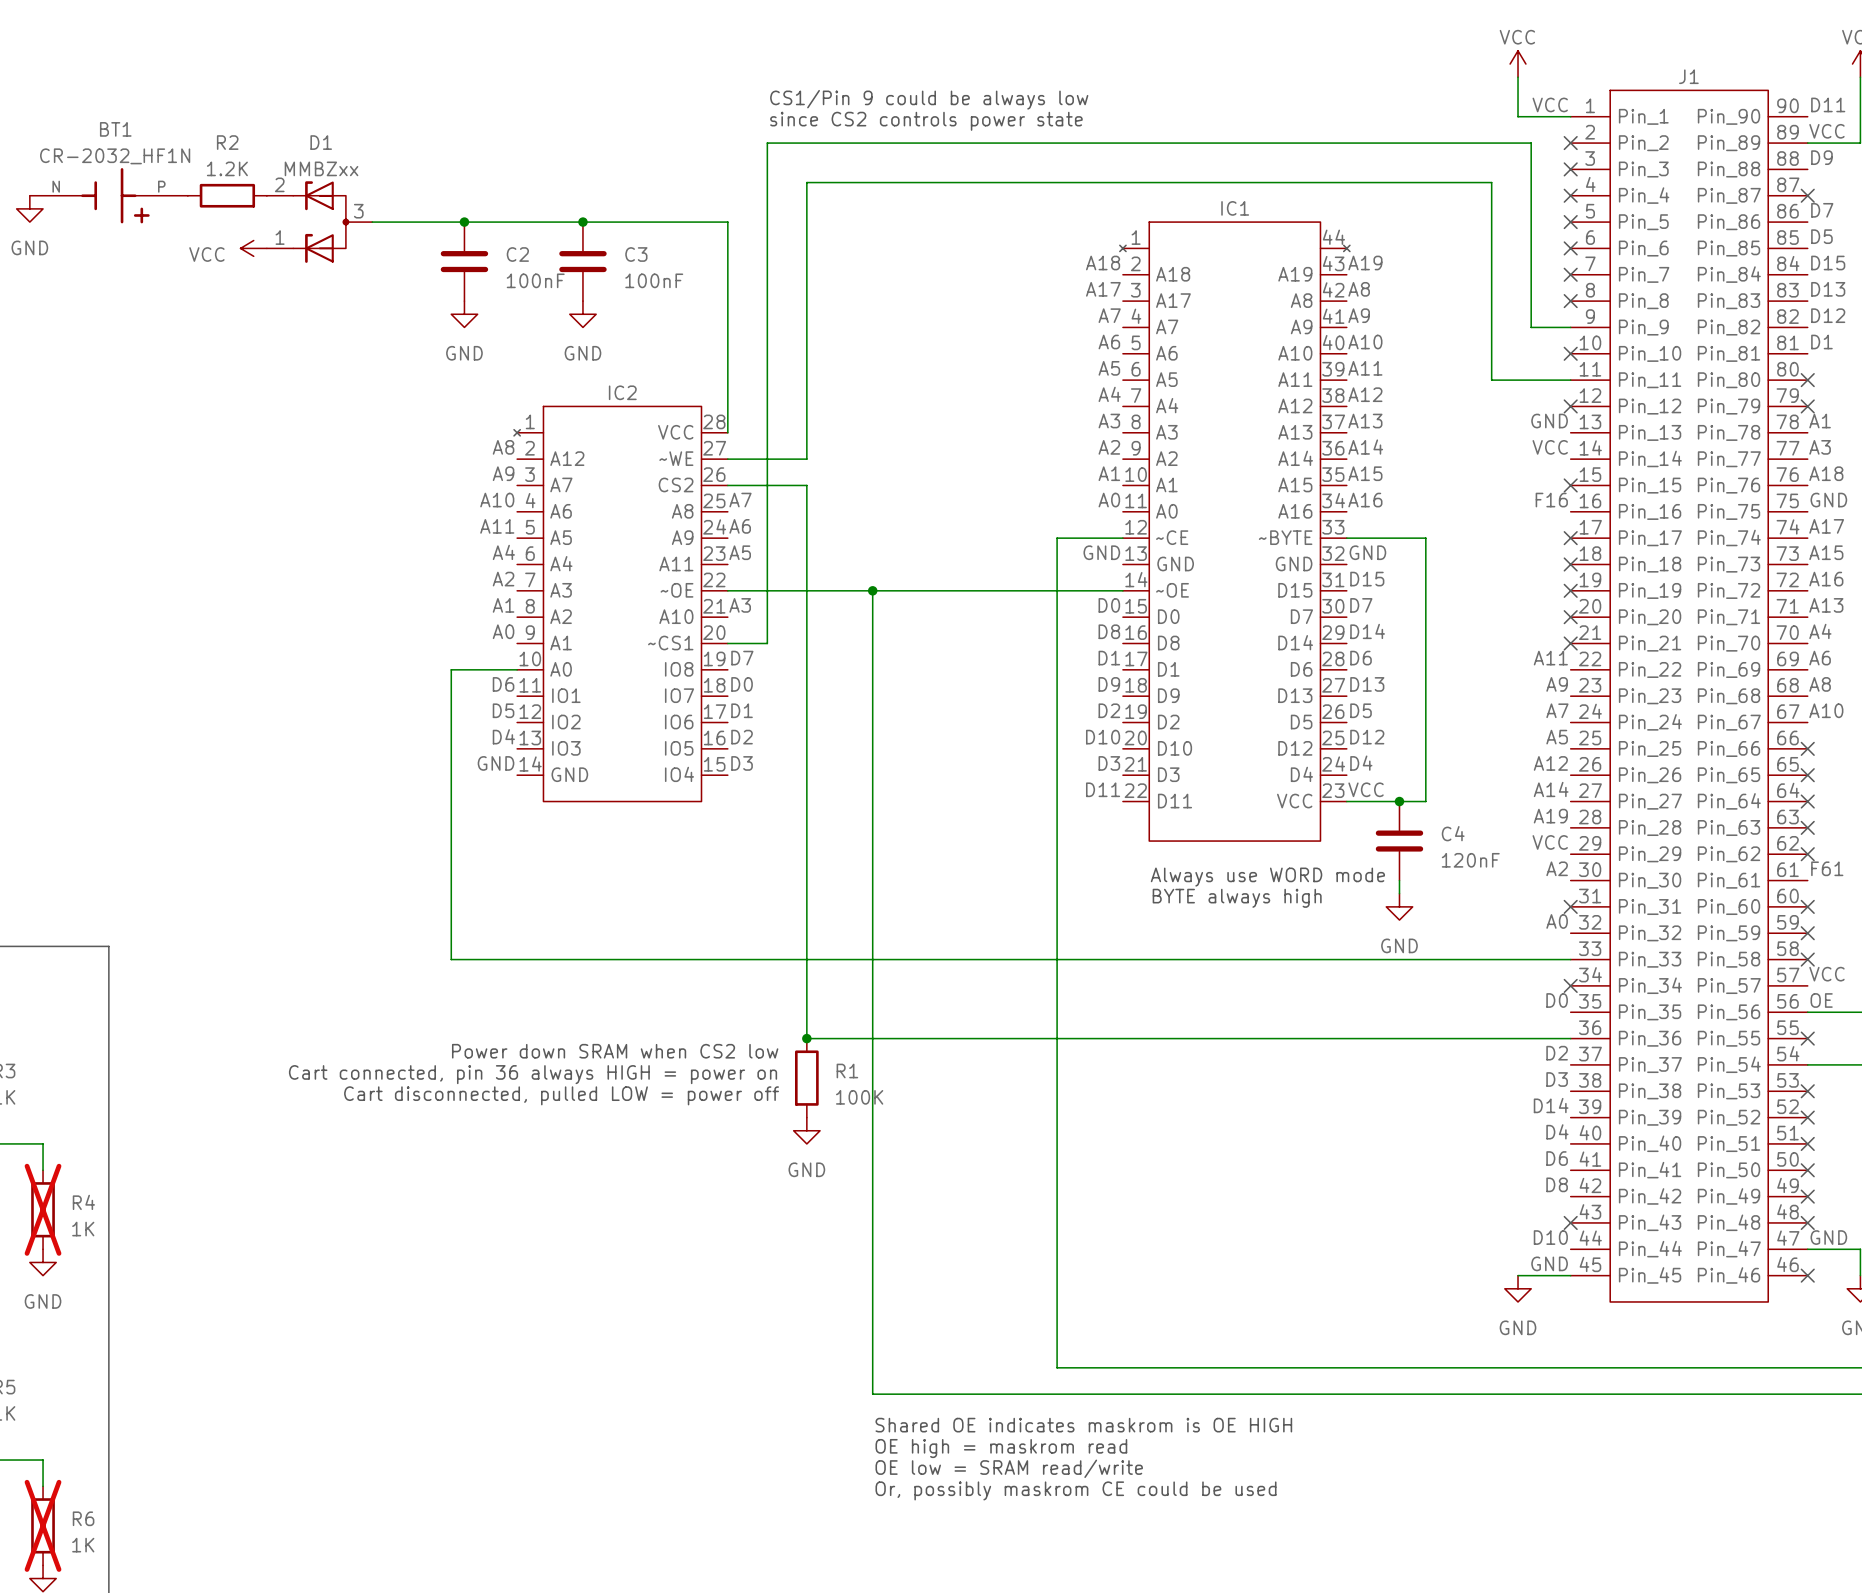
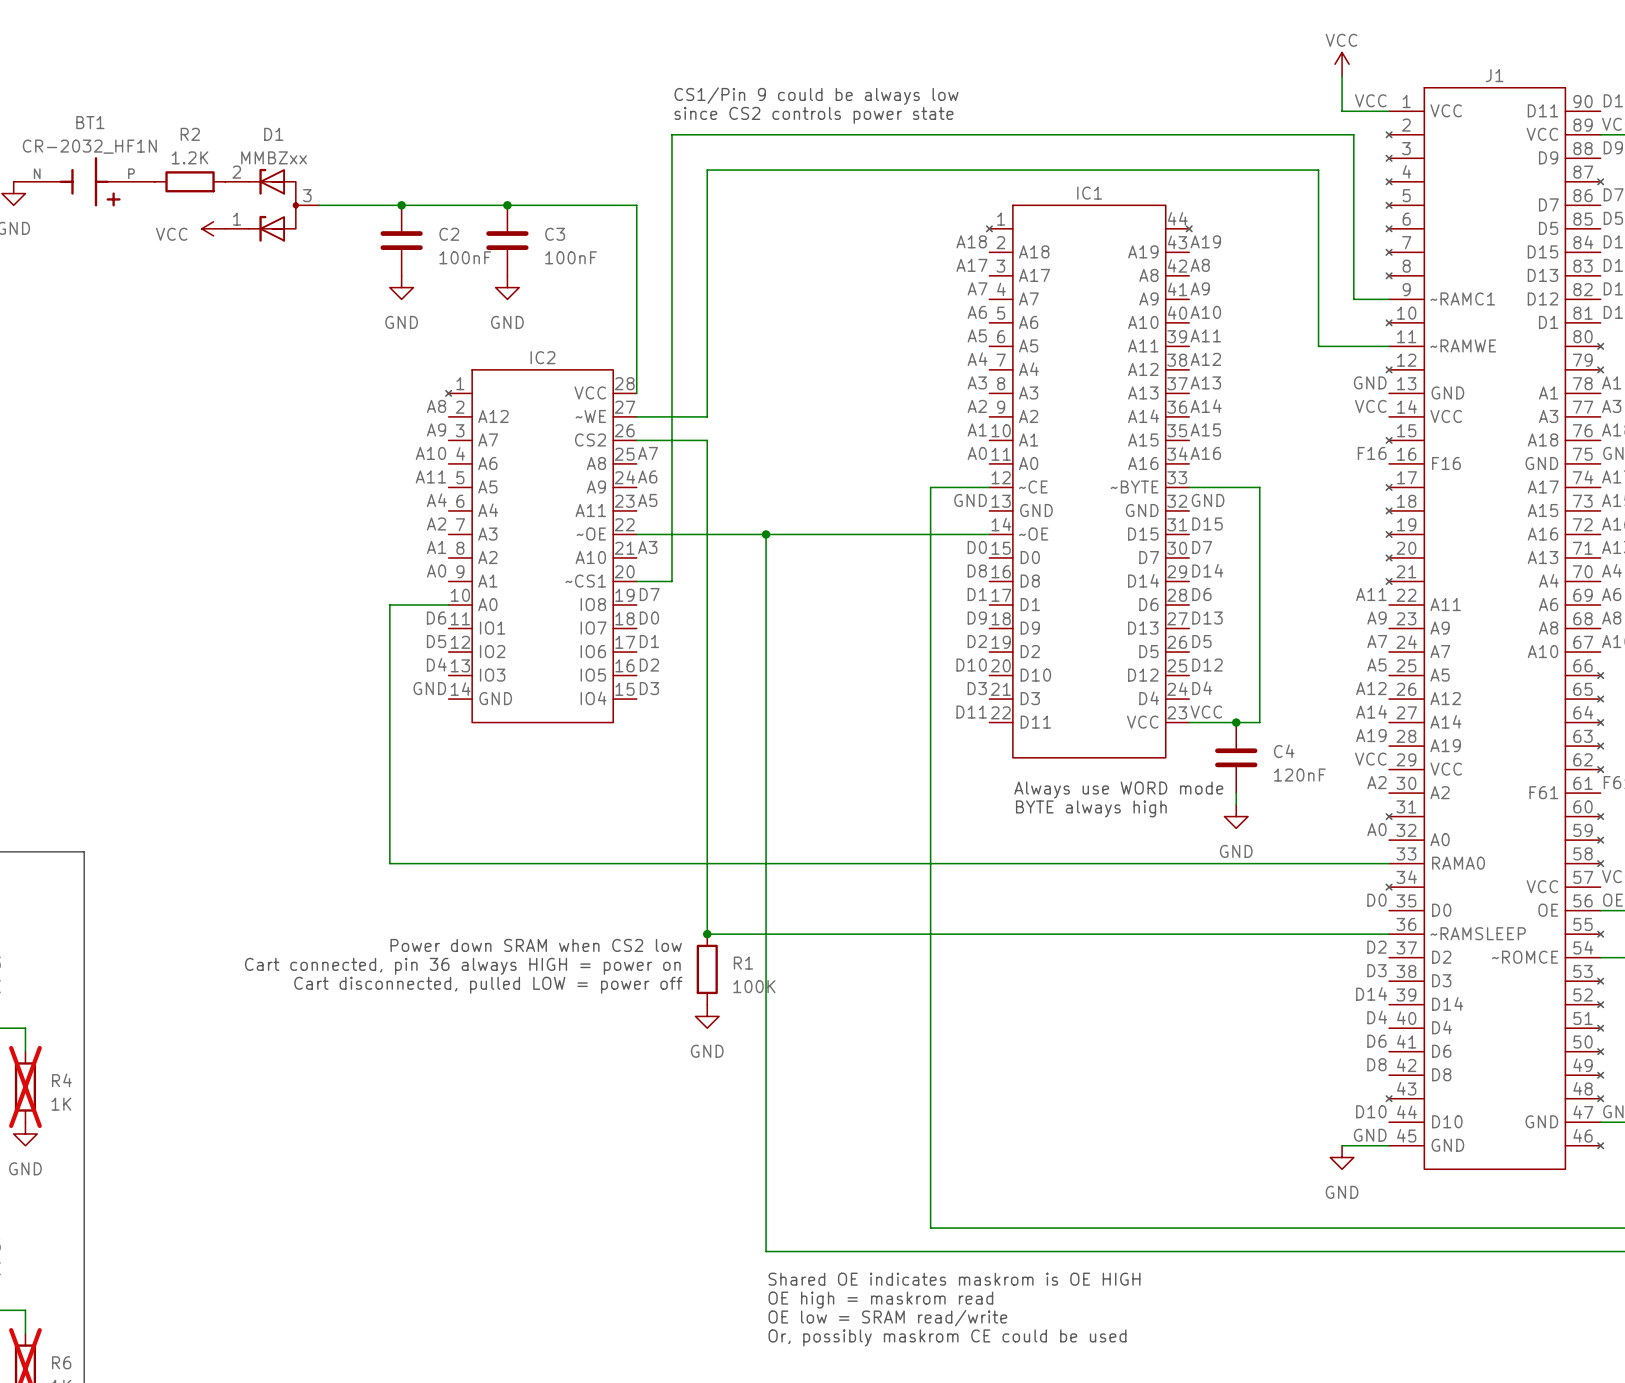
J1 symbol: [1570, 90, 1808, 1302] -> [1386, 87, 1604, 1170]
no-connect mark: (1570, 143) -> none
no-connect mark: (1570, 169) -> none
no-connect mark: (1570, 195) -> none
no-connect mark: (1807, 195) -> none
no-connect mark: (1570, 222) -> none
no-connect mark: (1570, 248) -> none
no-connect mark: (1570, 274) -> none
no-connect mark: (1570, 301) -> none
no-connect mark: (1570, 353) -> none
no-connect mark: (1807, 380) -> none
no-connect mark: (1570, 406) -> none
no-connect mark: (1807, 406) -> none
no-connect mark: (1570, 485) -> none
no-connect mark: (1570, 538) -> none
no-connect mark: (1570, 564) -> none
no-connect mark: (1570, 590) -> none
no-connect mark: (1570, 617) -> none
no-connect mark: (1570, 643) -> none
no-connect mark: (1807, 748) -> none
no-connect mark: (1807, 775) -> none
no-connect mark: (1807, 801) -> none
no-connect mark: (1807, 827) -> none
no-connect mark: (1807, 854) -> none
no-connect mark: (1570, 906) -> none
no-connect mark: (1807, 906) -> none
no-connect mark: (1807, 933) -> none
no-connect mark: (1807, 959) -> none
no-connect mark: (1570, 985) -> none
no-connect mark: (1807, 1038) -> none
no-connect mark: (1807, 1091) -> none
no-connect mark: (1807, 1117) -> none
no-connect mark: (1807, 1143) -> none
no-connect mark: (1807, 1170) -> none
no-connect mark: (1807, 1196) -> none
no-connect mark: (1570, 1222) -> none
no-connect mark: (1807, 1222) -> none
no-connect mark: (1807, 1275) -> none

